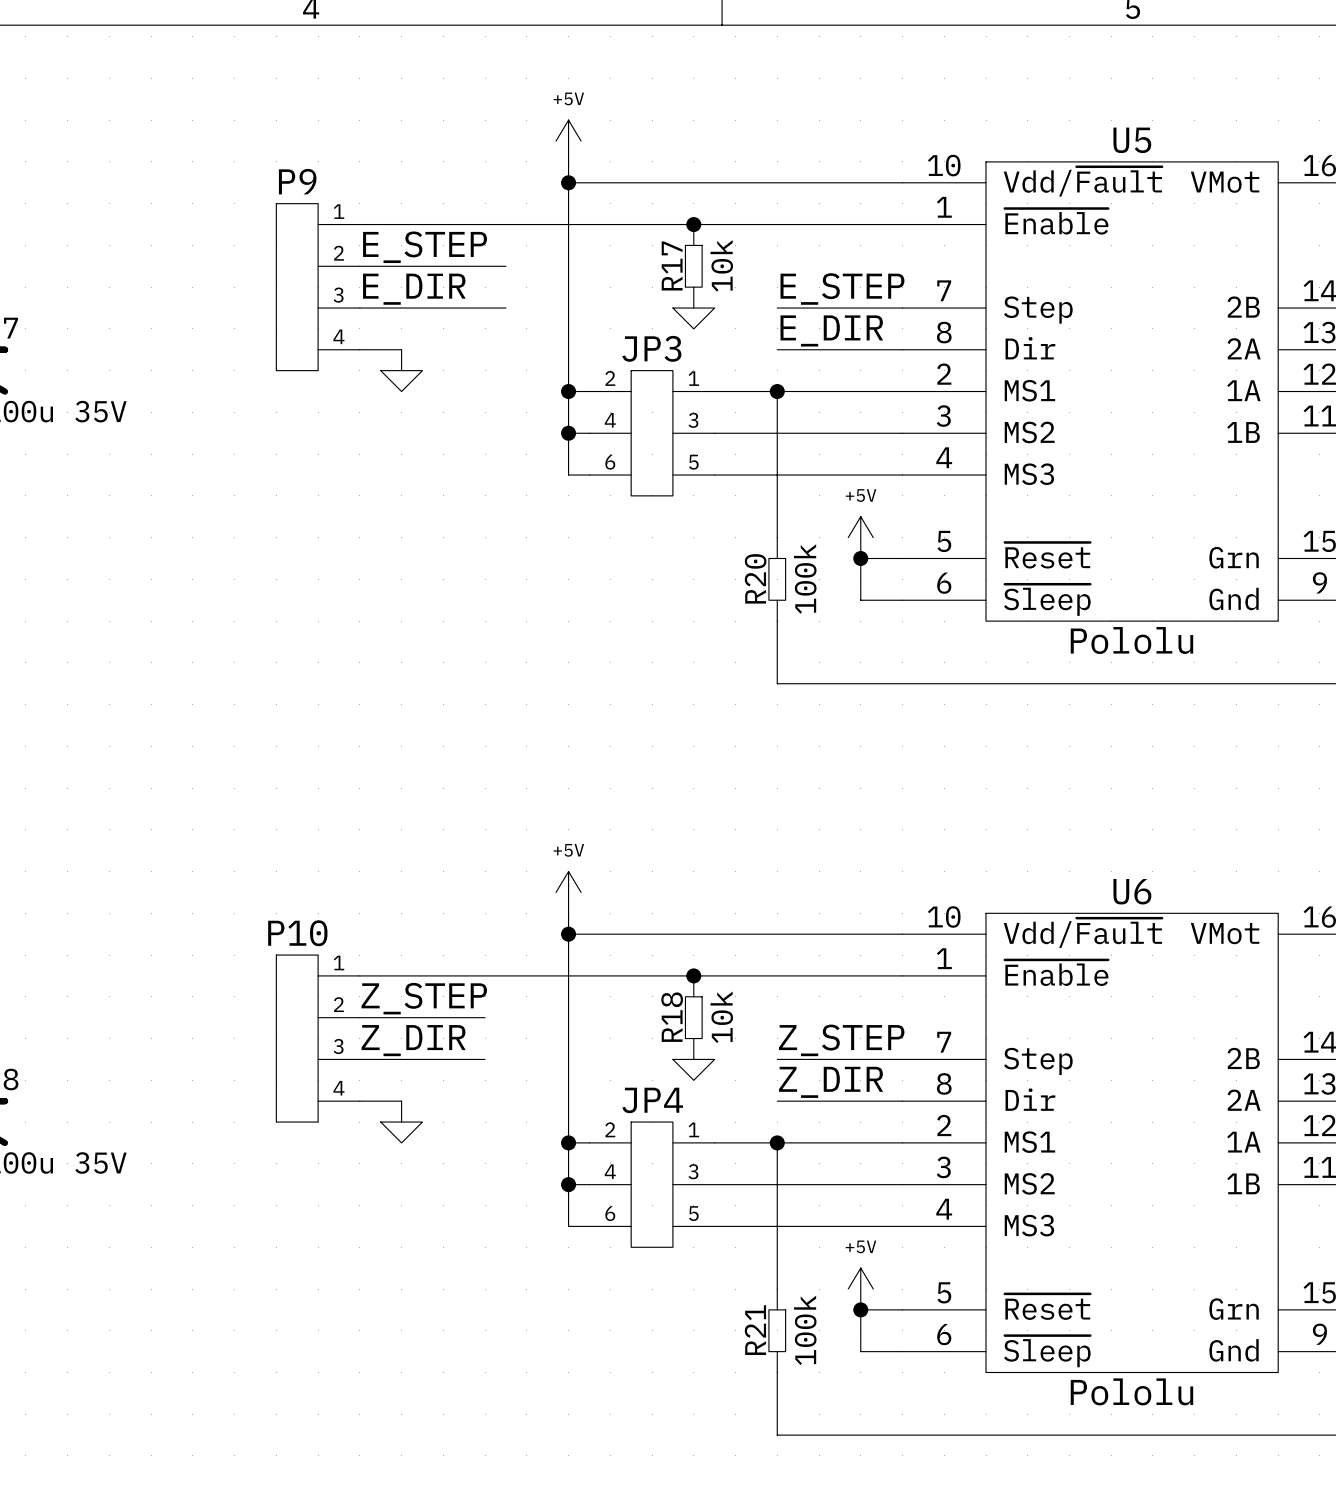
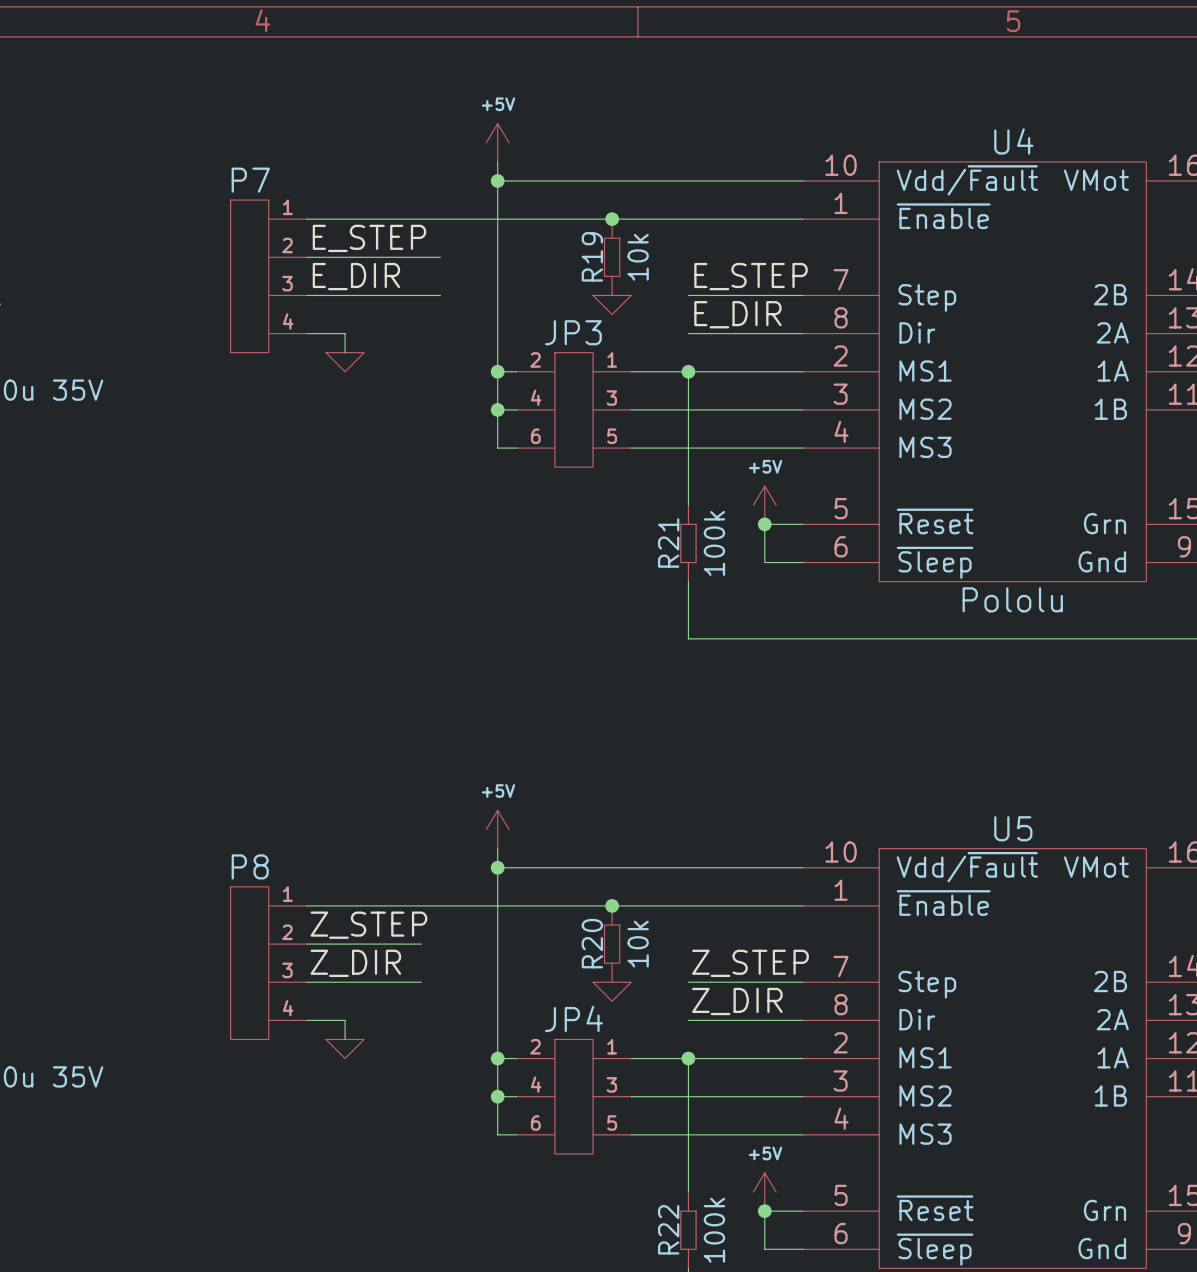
U5 name: U5 (1132, 140) -> U4 (1013, 141)
P9 name: P9 (297, 181) -> P7 (250, 180)
R17 name: R17 (672, 265) -> R19 (592, 256)
R20 name: R20 (755, 578) -> R21 (668, 543)
U6 name: U6 (1132, 891) -> U5 (1013, 828)
P10 name: P10 (297, 933) -> P8 (250, 866)
R18 name: R18 (672, 1017) -> R20 (592, 943)
R21 name: R21 (755, 1330) -> R22 (668, 1229)

